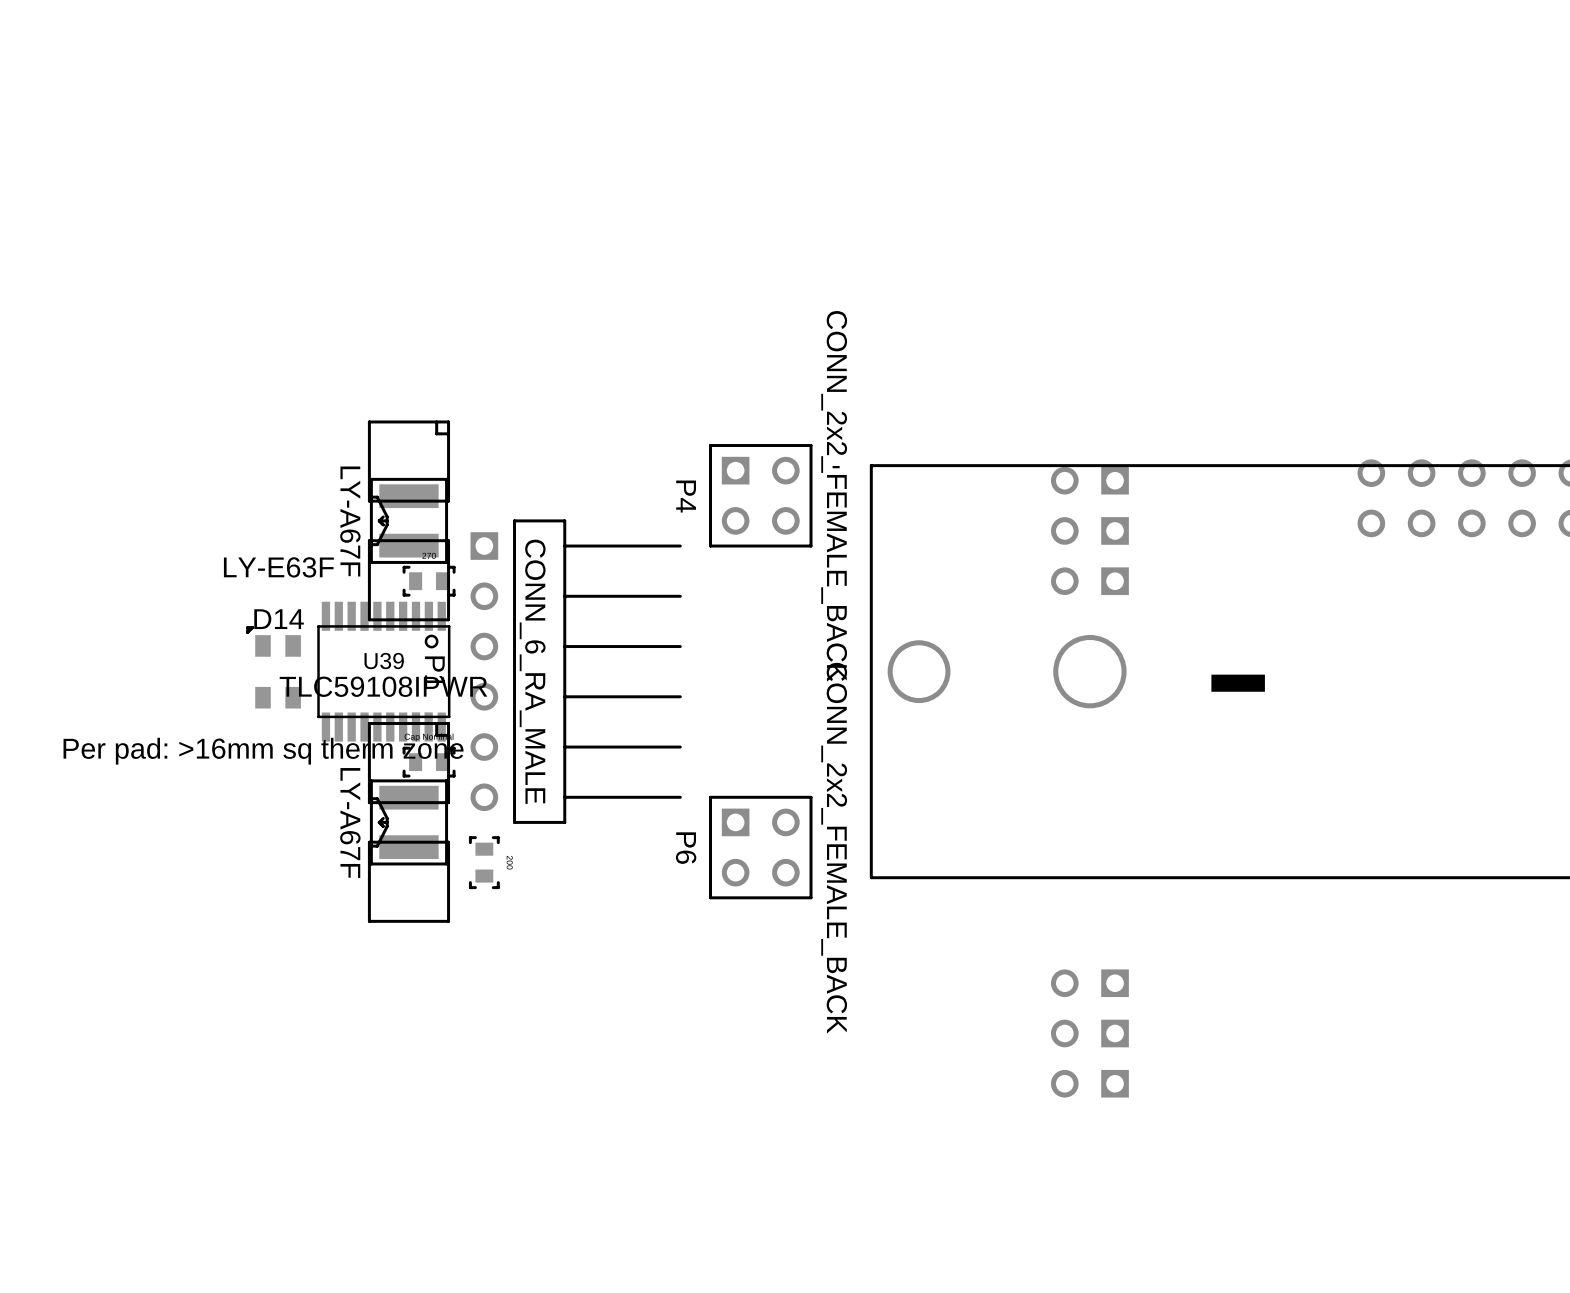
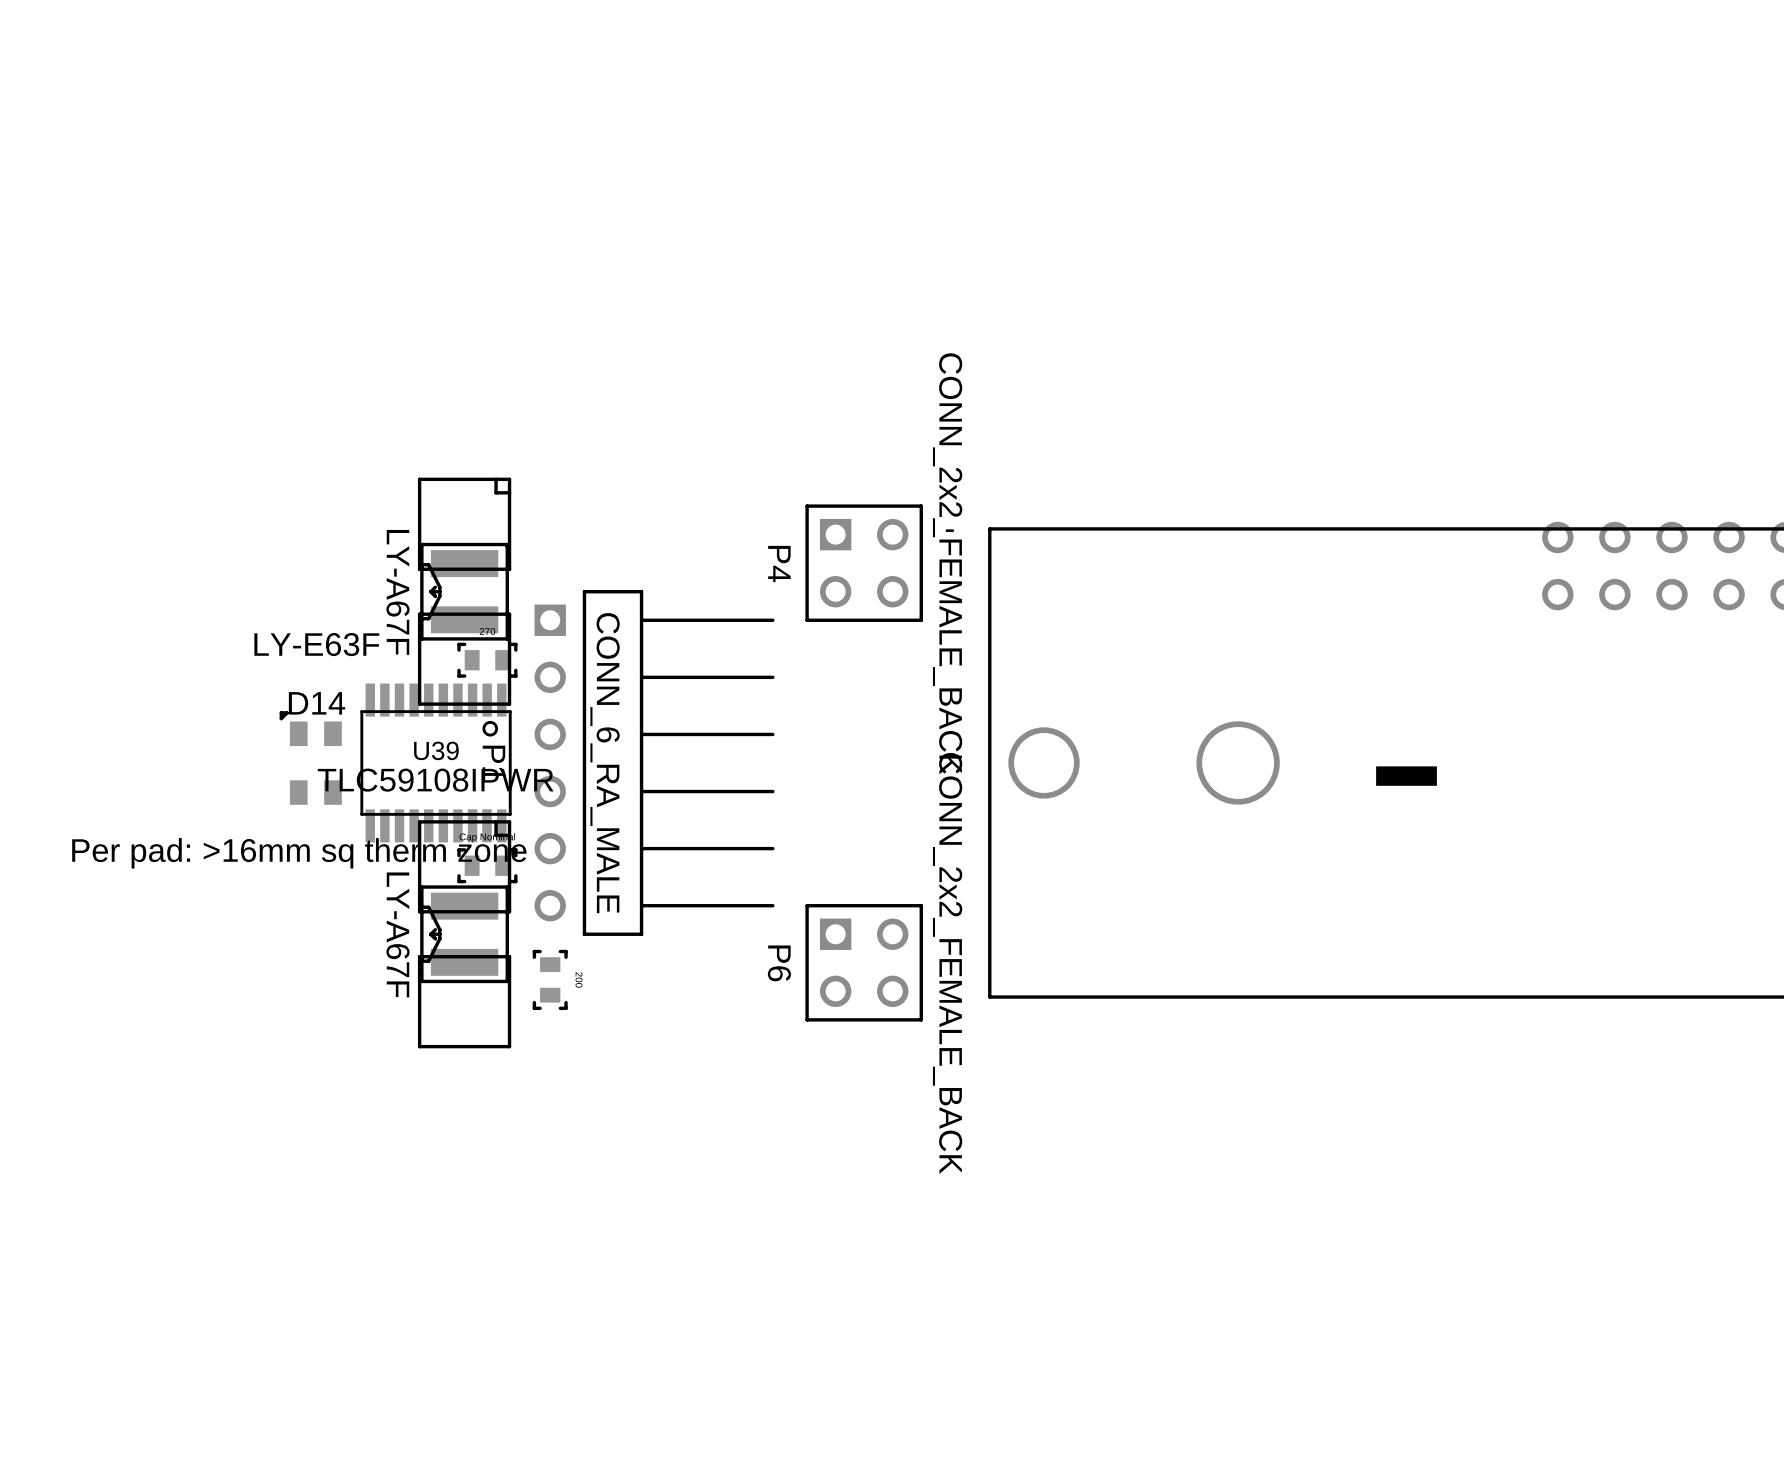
part: (1089, 480) -> none
part: (1089, 530) -> none
part: (1089, 581) -> none
part: (1089, 983) -> none
part: (1089, 1033) -> none
part: (1089, 1083) -> none

